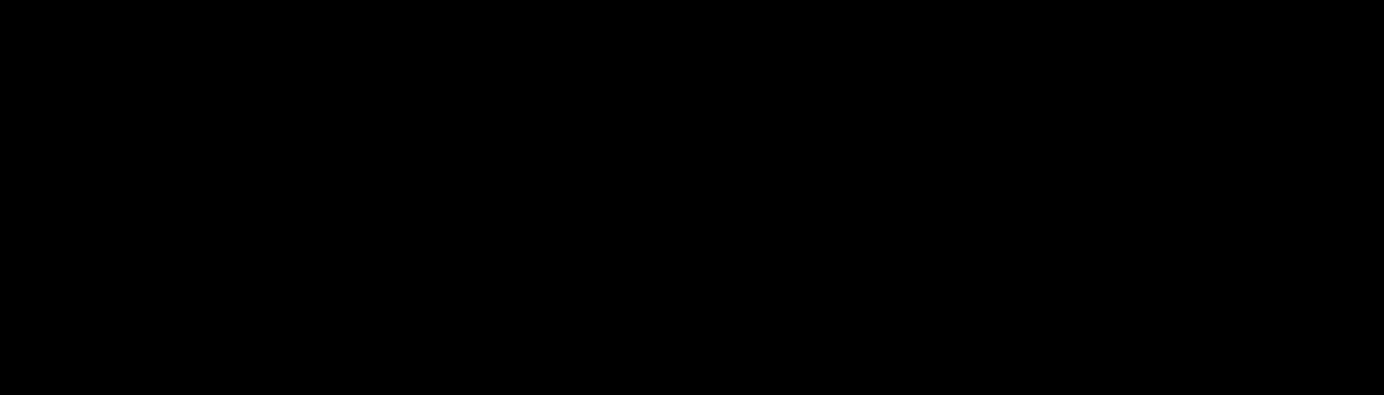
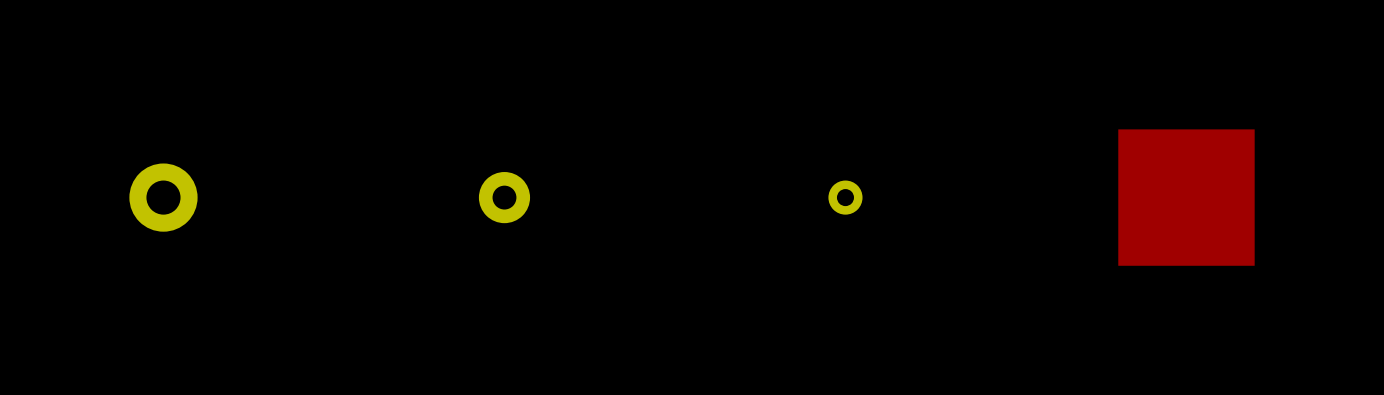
part: none -> (163, 197)
part: none -> (504, 197)
part: none -> (845, 197)
part: none -> (1186, 197)

